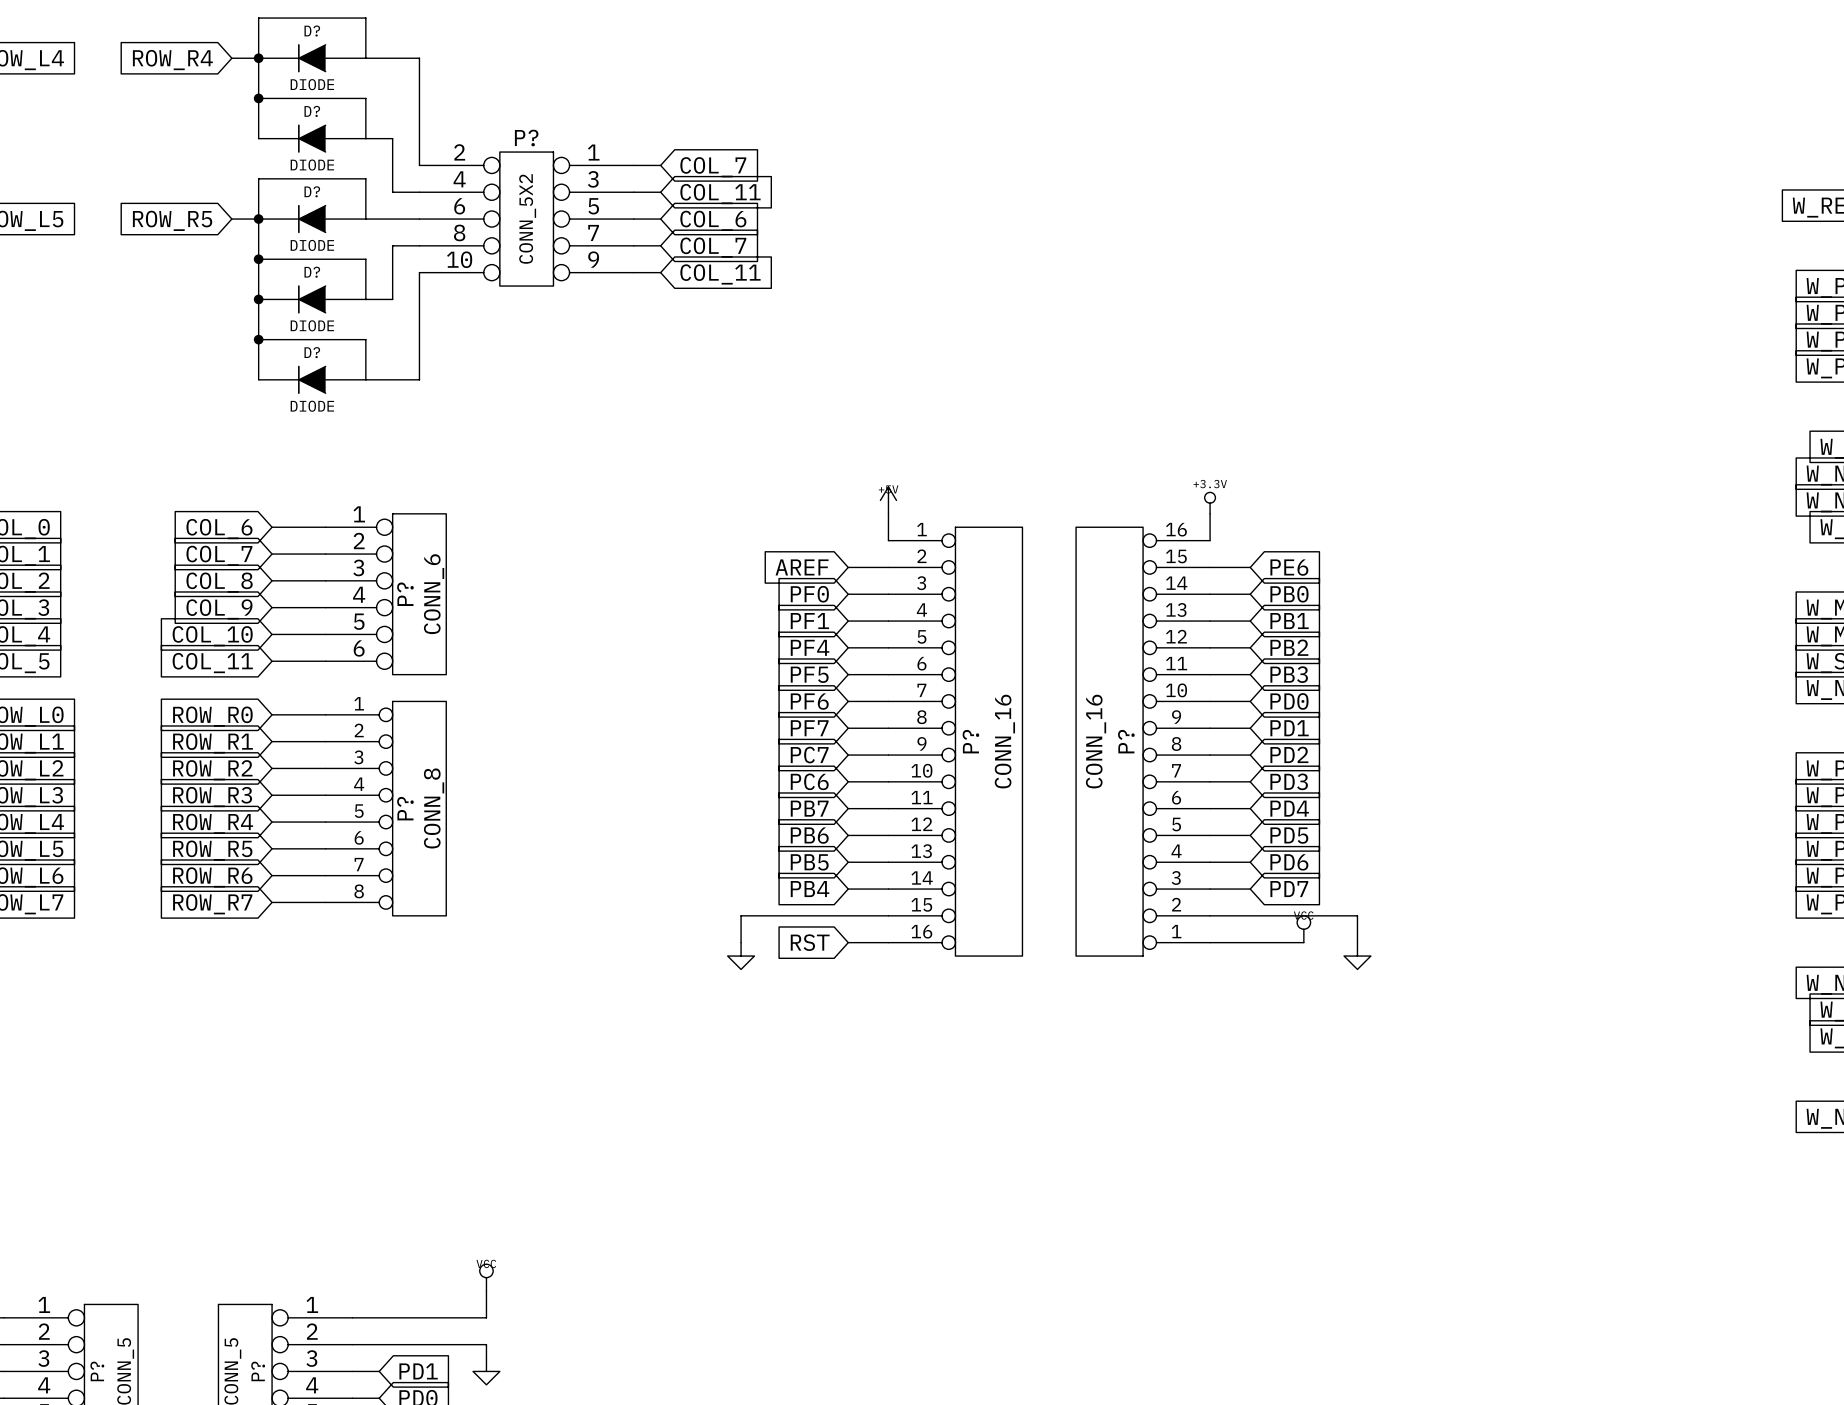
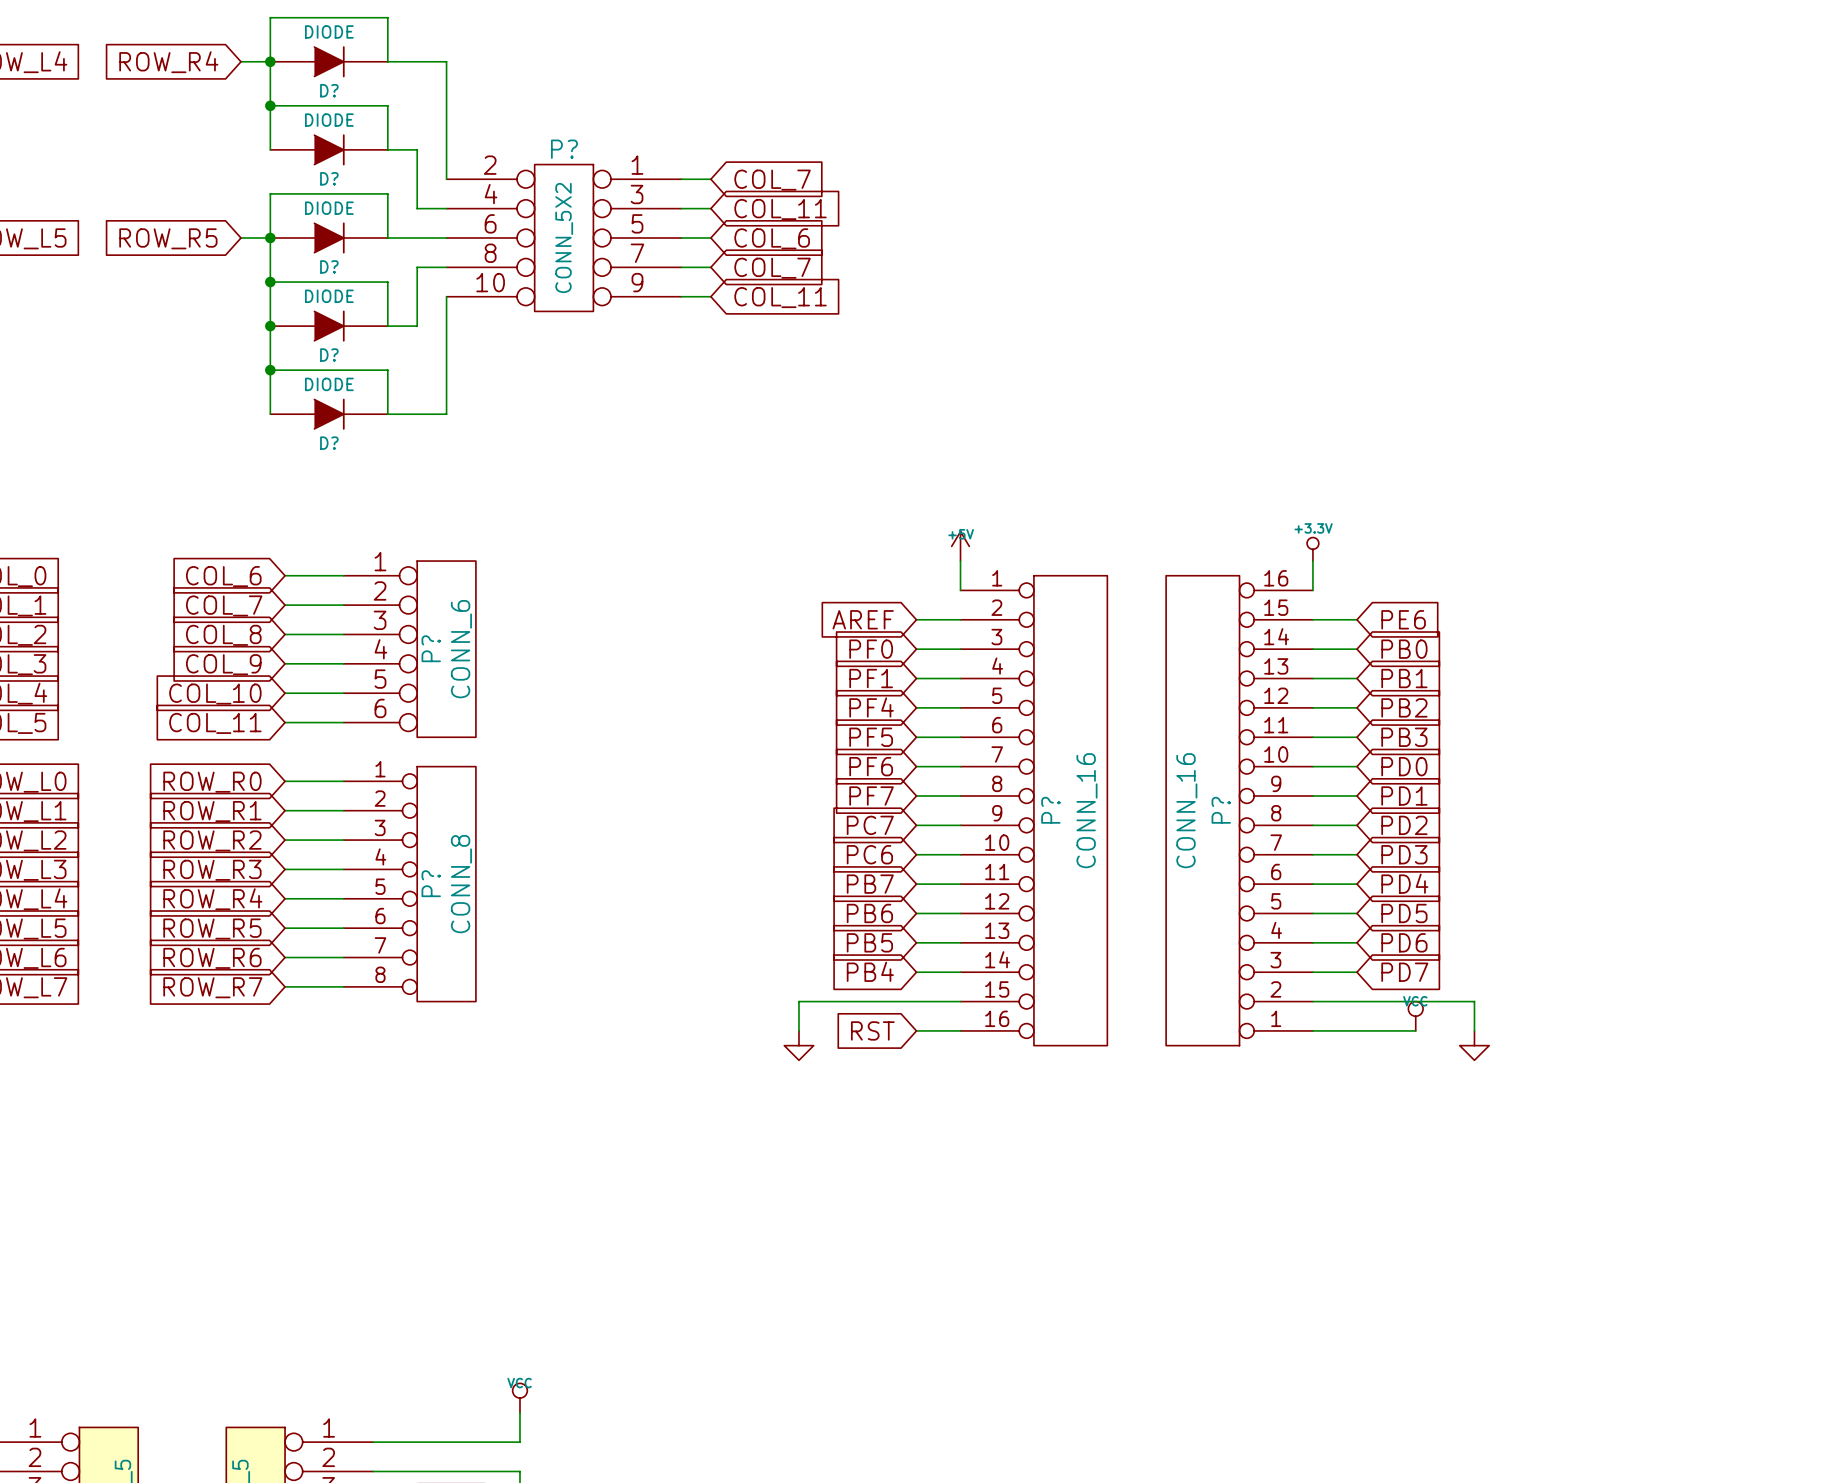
D? rotation: 0° (311, 58) -> 180° (329, 61)
D? rotation: 0° (311, 138) -> 180° (329, 149)
D? rotation: 0° (311, 219) -> 180° (329, 237)
D? rotation: 0° (311, 299) -> 180° (329, 326)
D? rotation: 0° (311, 379) -> 180° (329, 414)

